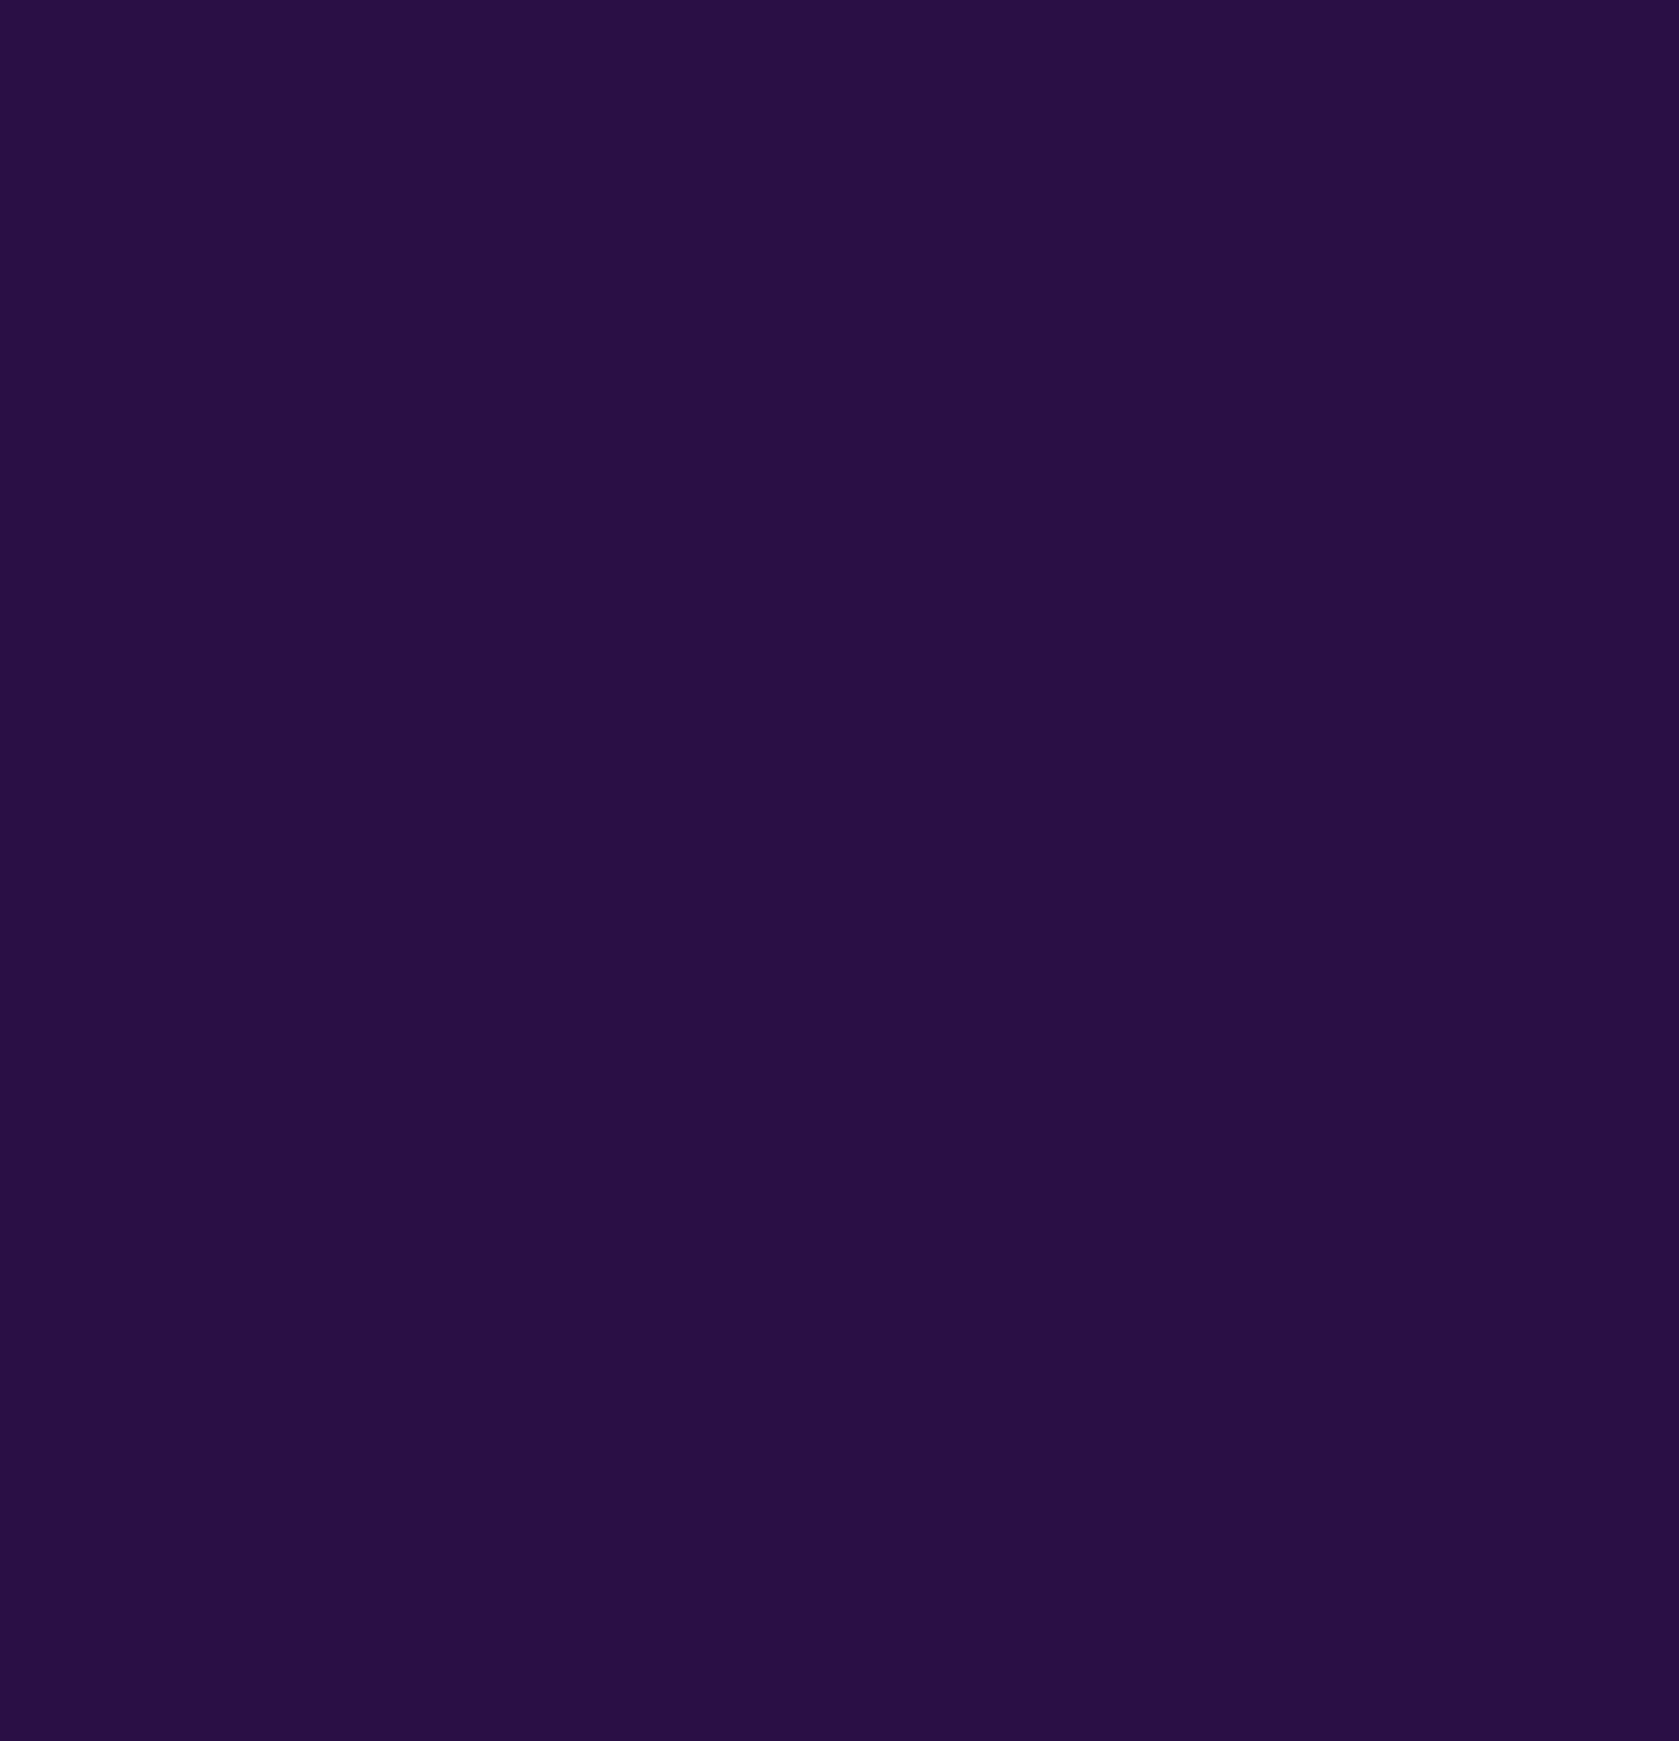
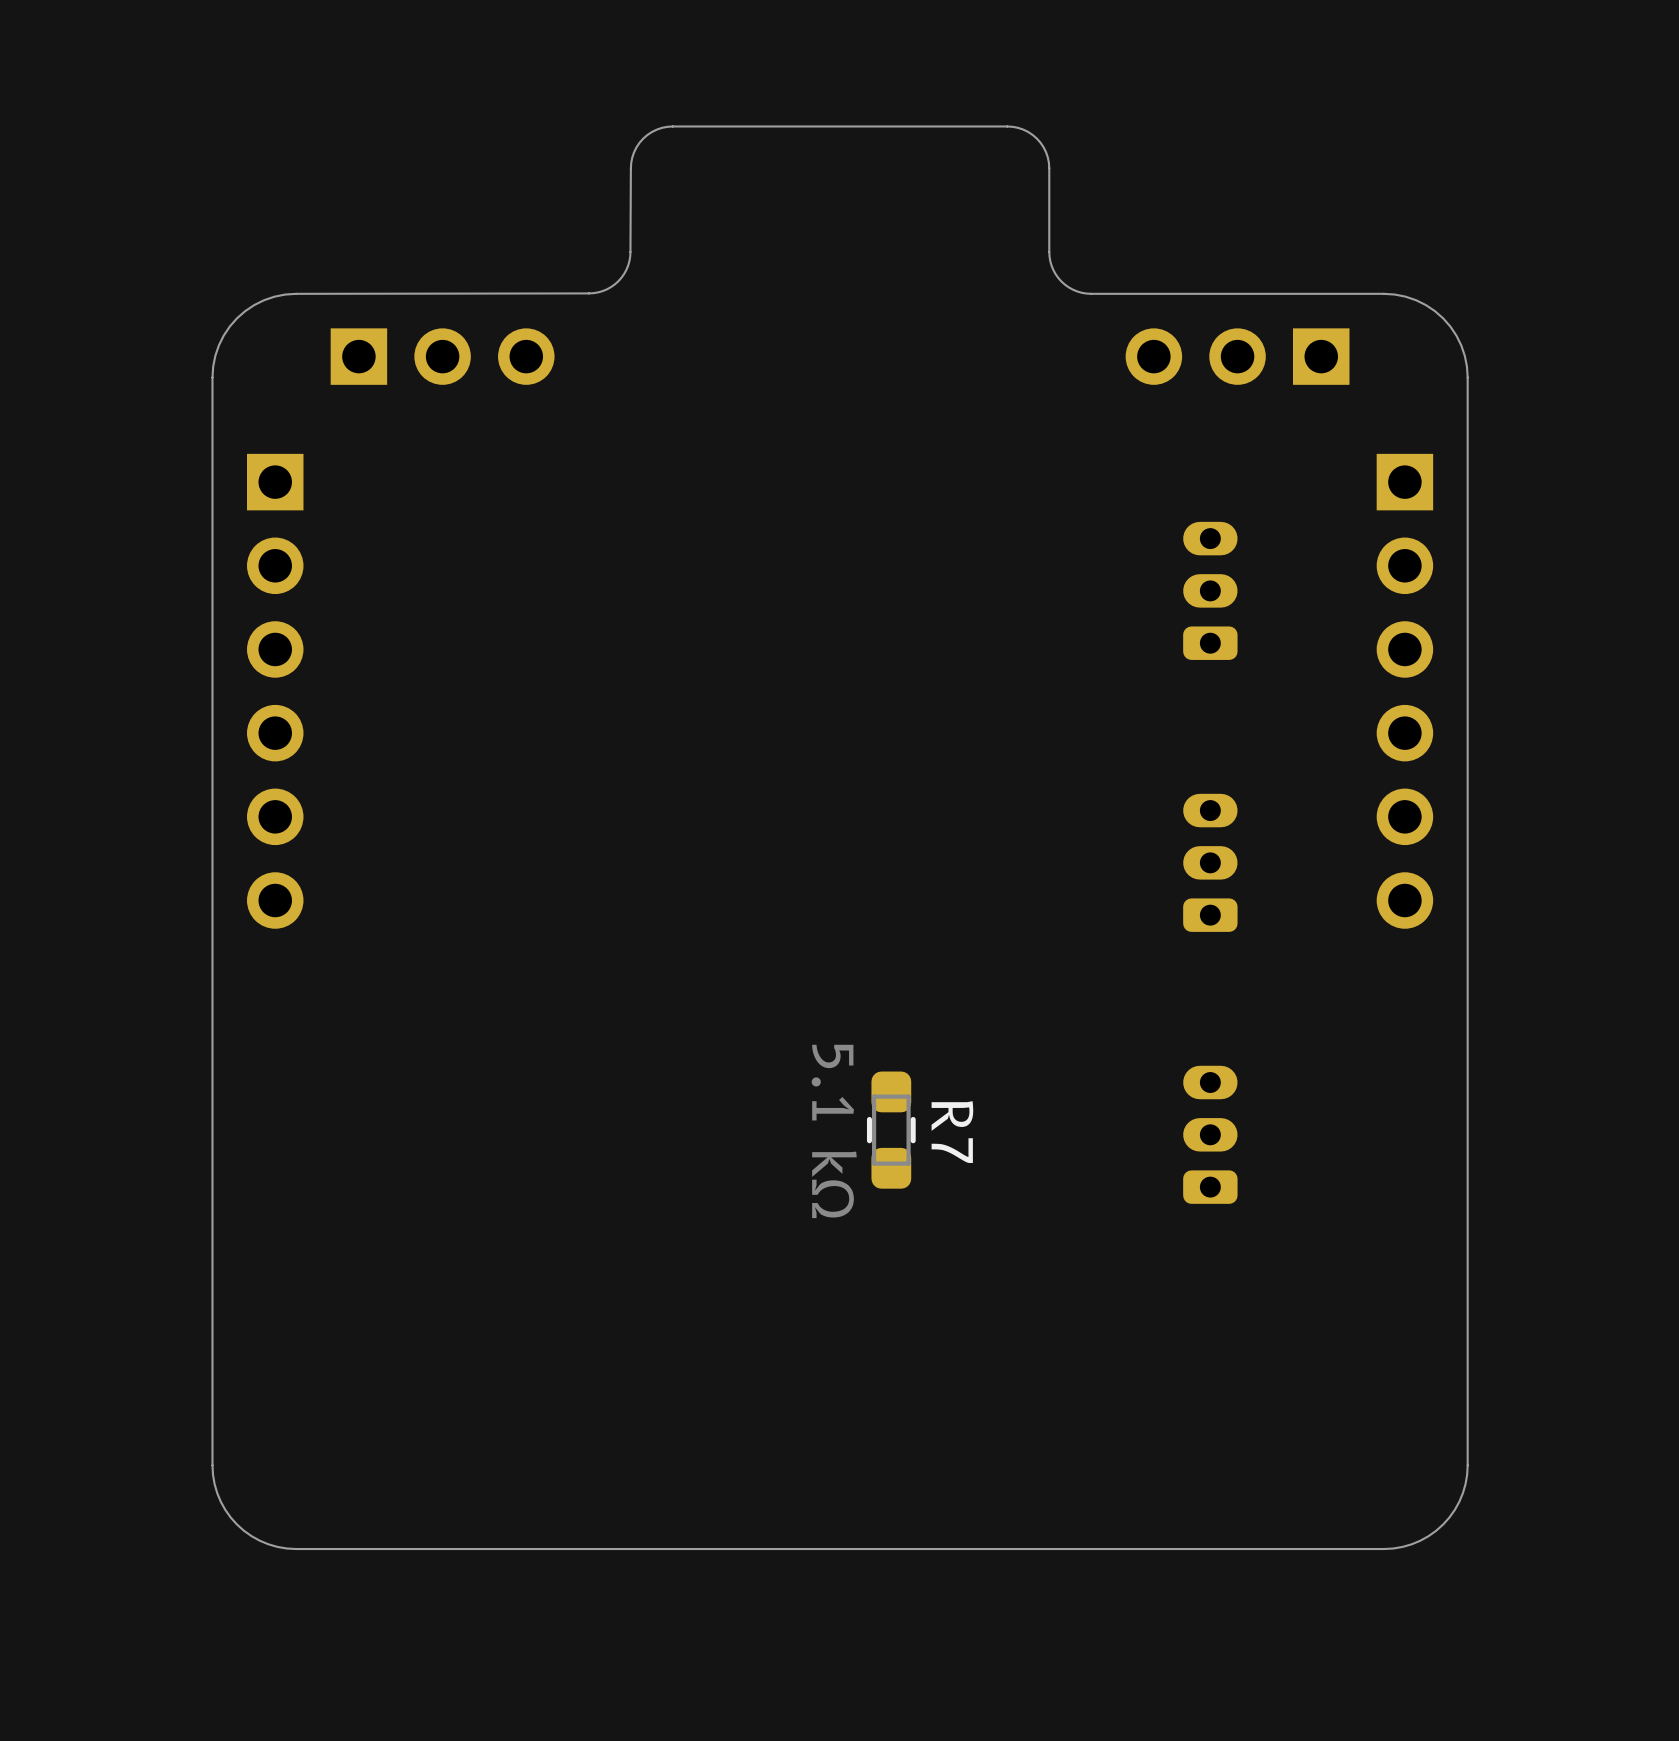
board edge: none -> (1007, 126) (661, 127) (643, 138) (634, 152) (630, 168) (629, 261) (621, 277) (607, 289) (589, 293) (285, 294) (264, 300) (245, 311) (223, 335) (215, 355) (212, 377) (212, 1465) (217, 1492) (225, 1509) (243, 1530) (259, 1540) (277, 1546) (296, 1549) (1383, 1549) (1411, 1544) (1428, 1536) (1449, 1517) (1459, 1501) (1465, 1483) (1467, 1465) (1467, 377) (1464, 355) (1456, 335) (1443, 318) (1425, 305) (1394, 294) (1091, 293) (1072, 289) (1058, 278) (1050, 261) (1049, 168) (1046, 152) (1037, 138) (1028, 132) (1007, 126)
part: none -> (442, 356)
part: none -> (1237, 356)
part: none -> (1210, 590)
part: none -> (275, 691)
part: none -> (1404, 691)
part: none -> (1210, 862)
R7: none -> 5.1 kΩ (891, 1130)
part: none -> (1210, 1134)

